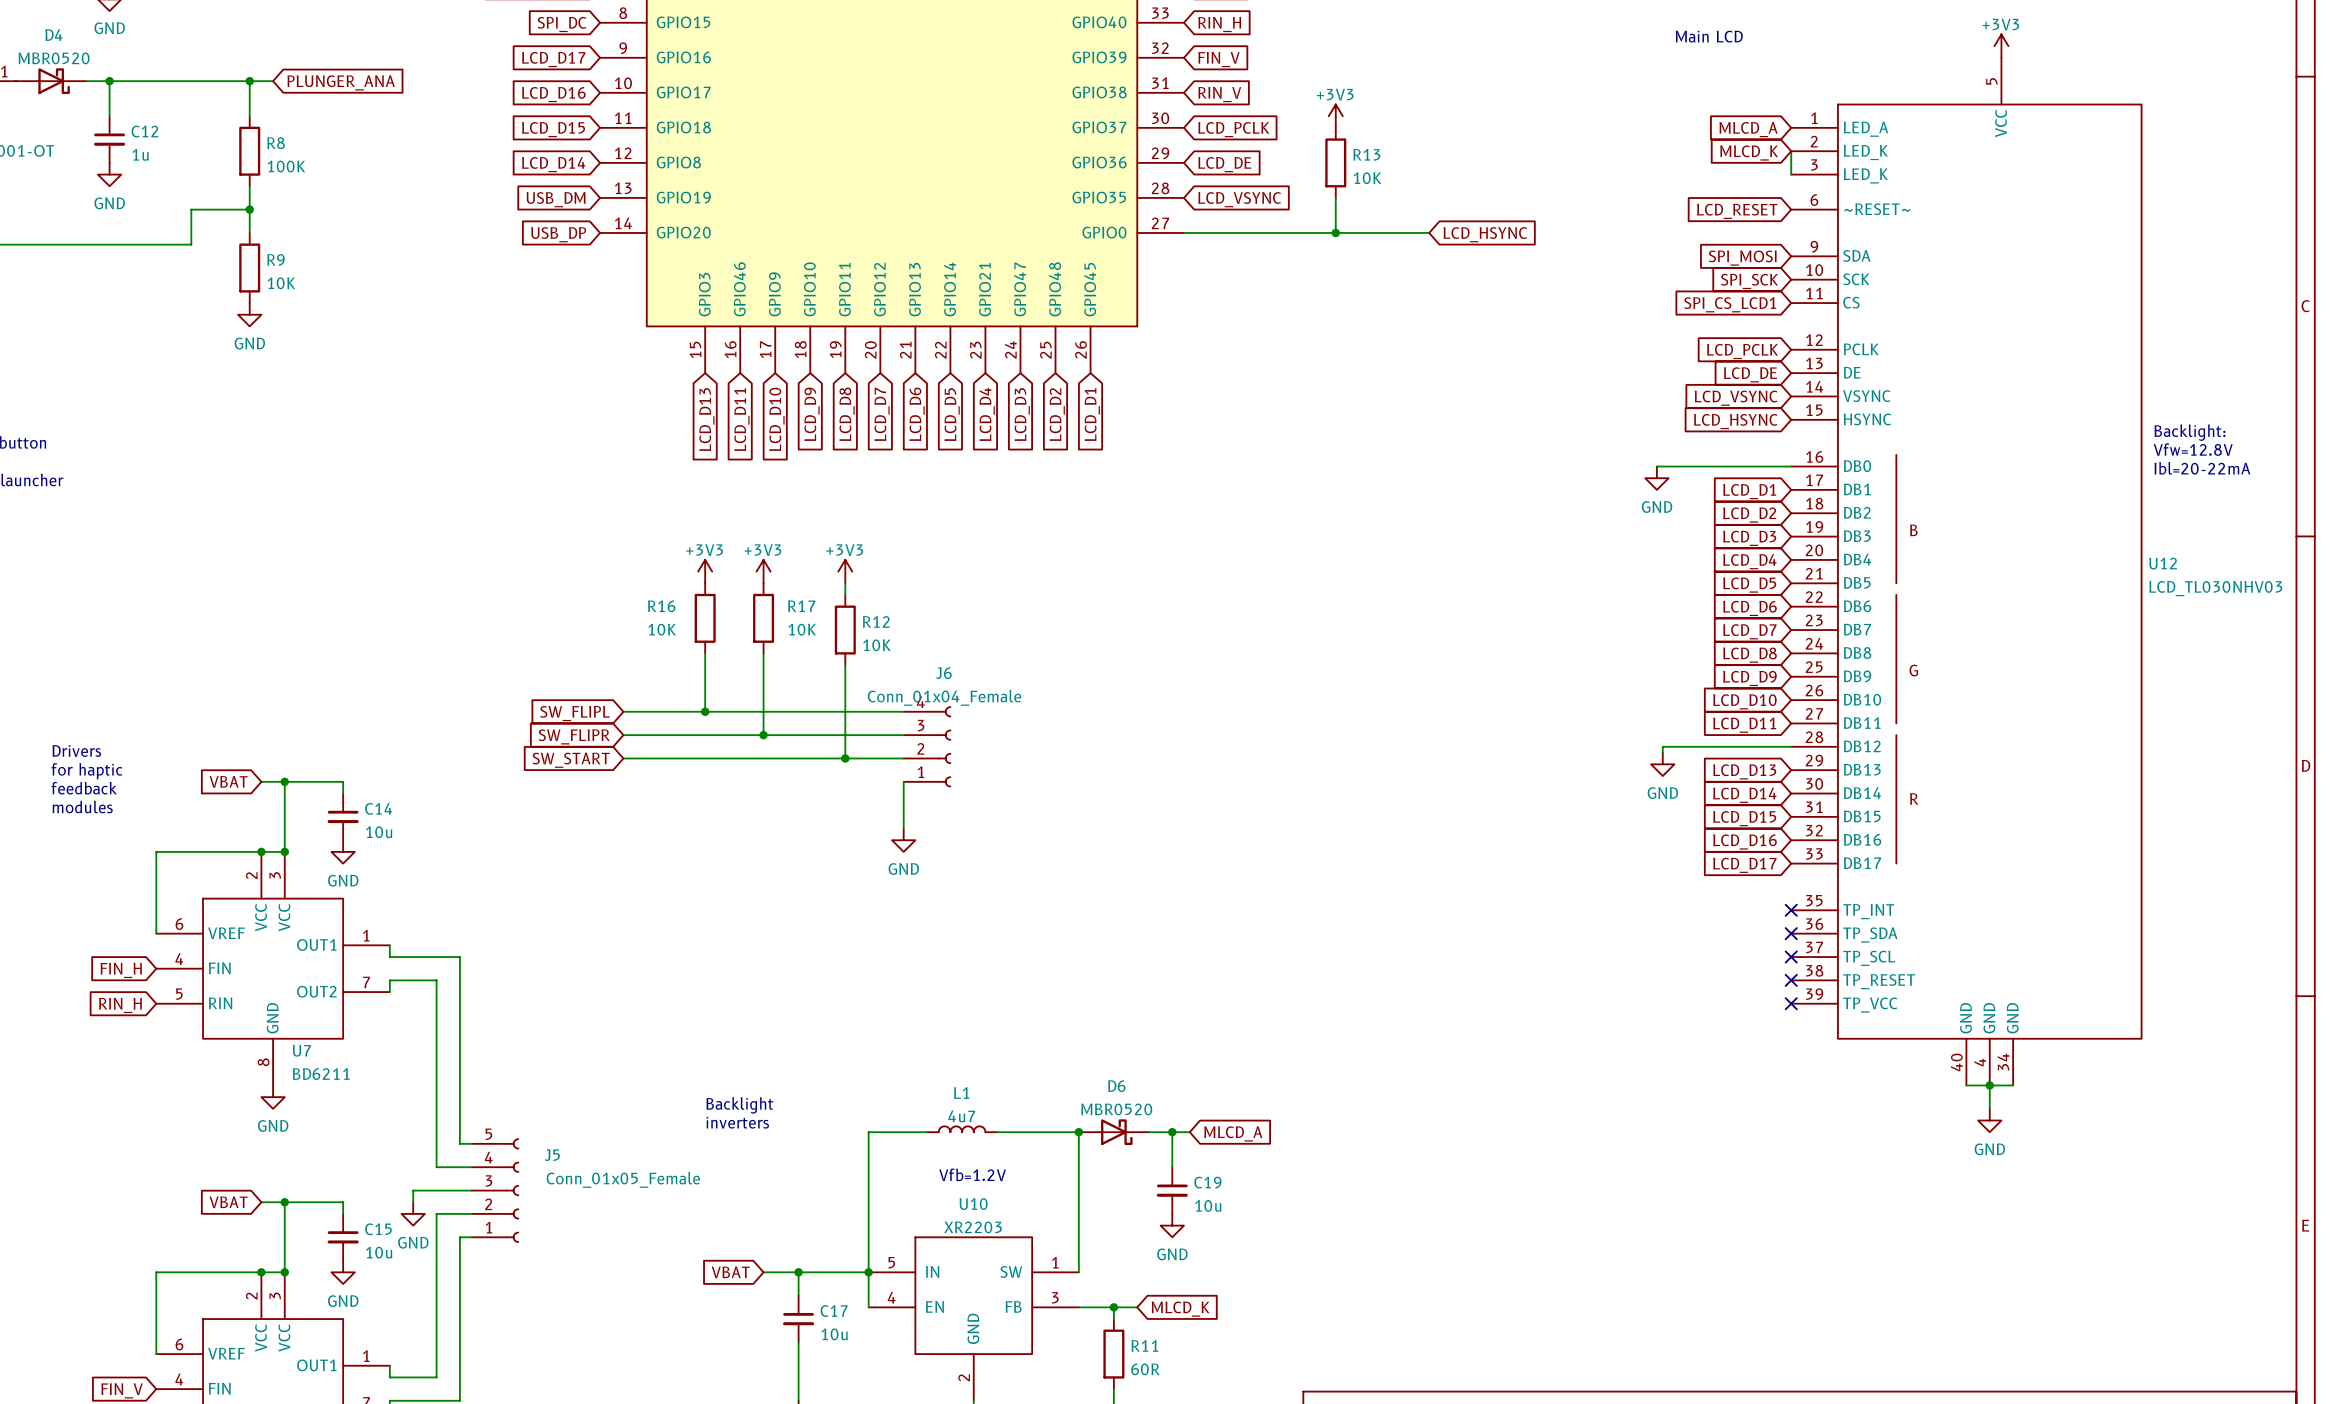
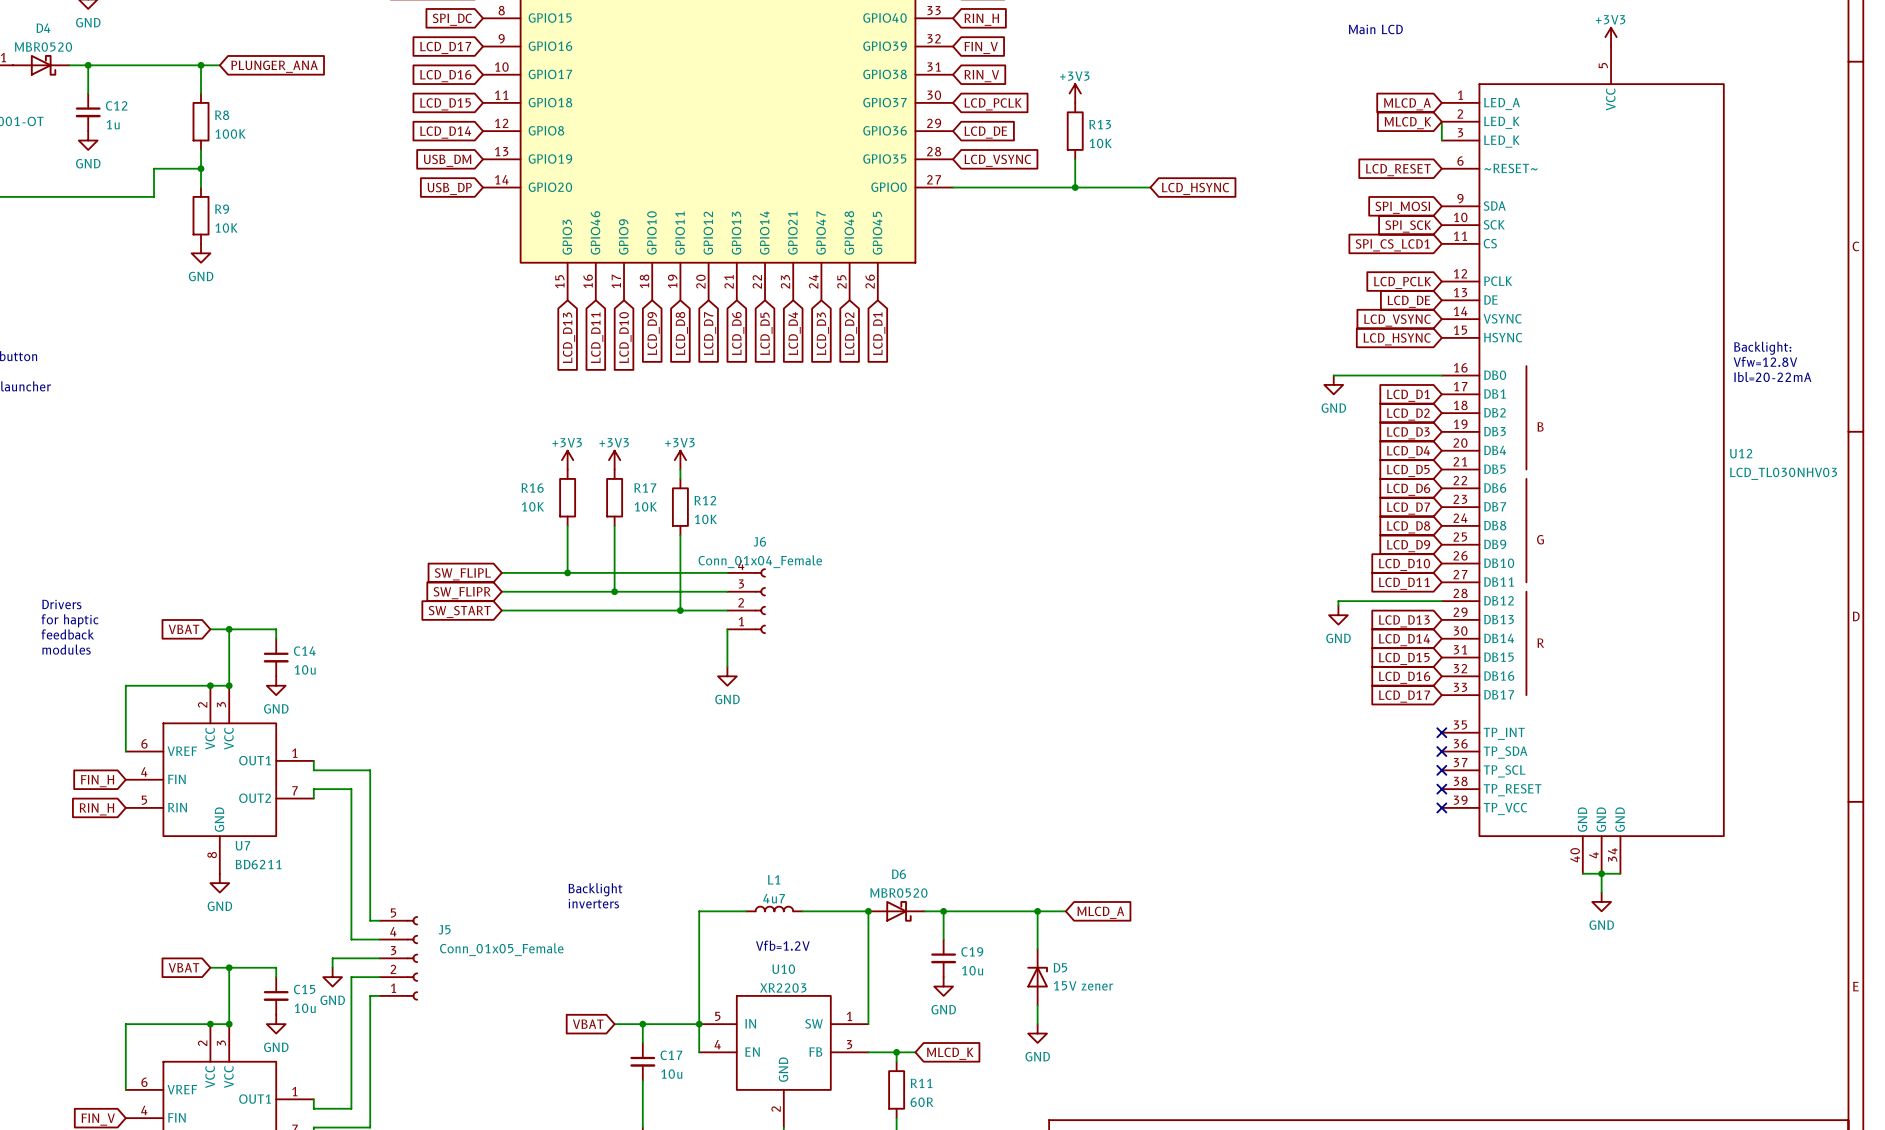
wire: none -> (957, 911) (1065, 911)
wire: none -> (1037, 911) (1037, 948)
junction: none -> (1037, 911)
global label position: MLCD_A (1233, 1133) -> MLCD_A (1100, 912)
D5: none -> 15V zener (1037, 977)
wire: none -> (1037, 1005) (1037, 1024)
power symbol: none -> GND (1037, 1033)

